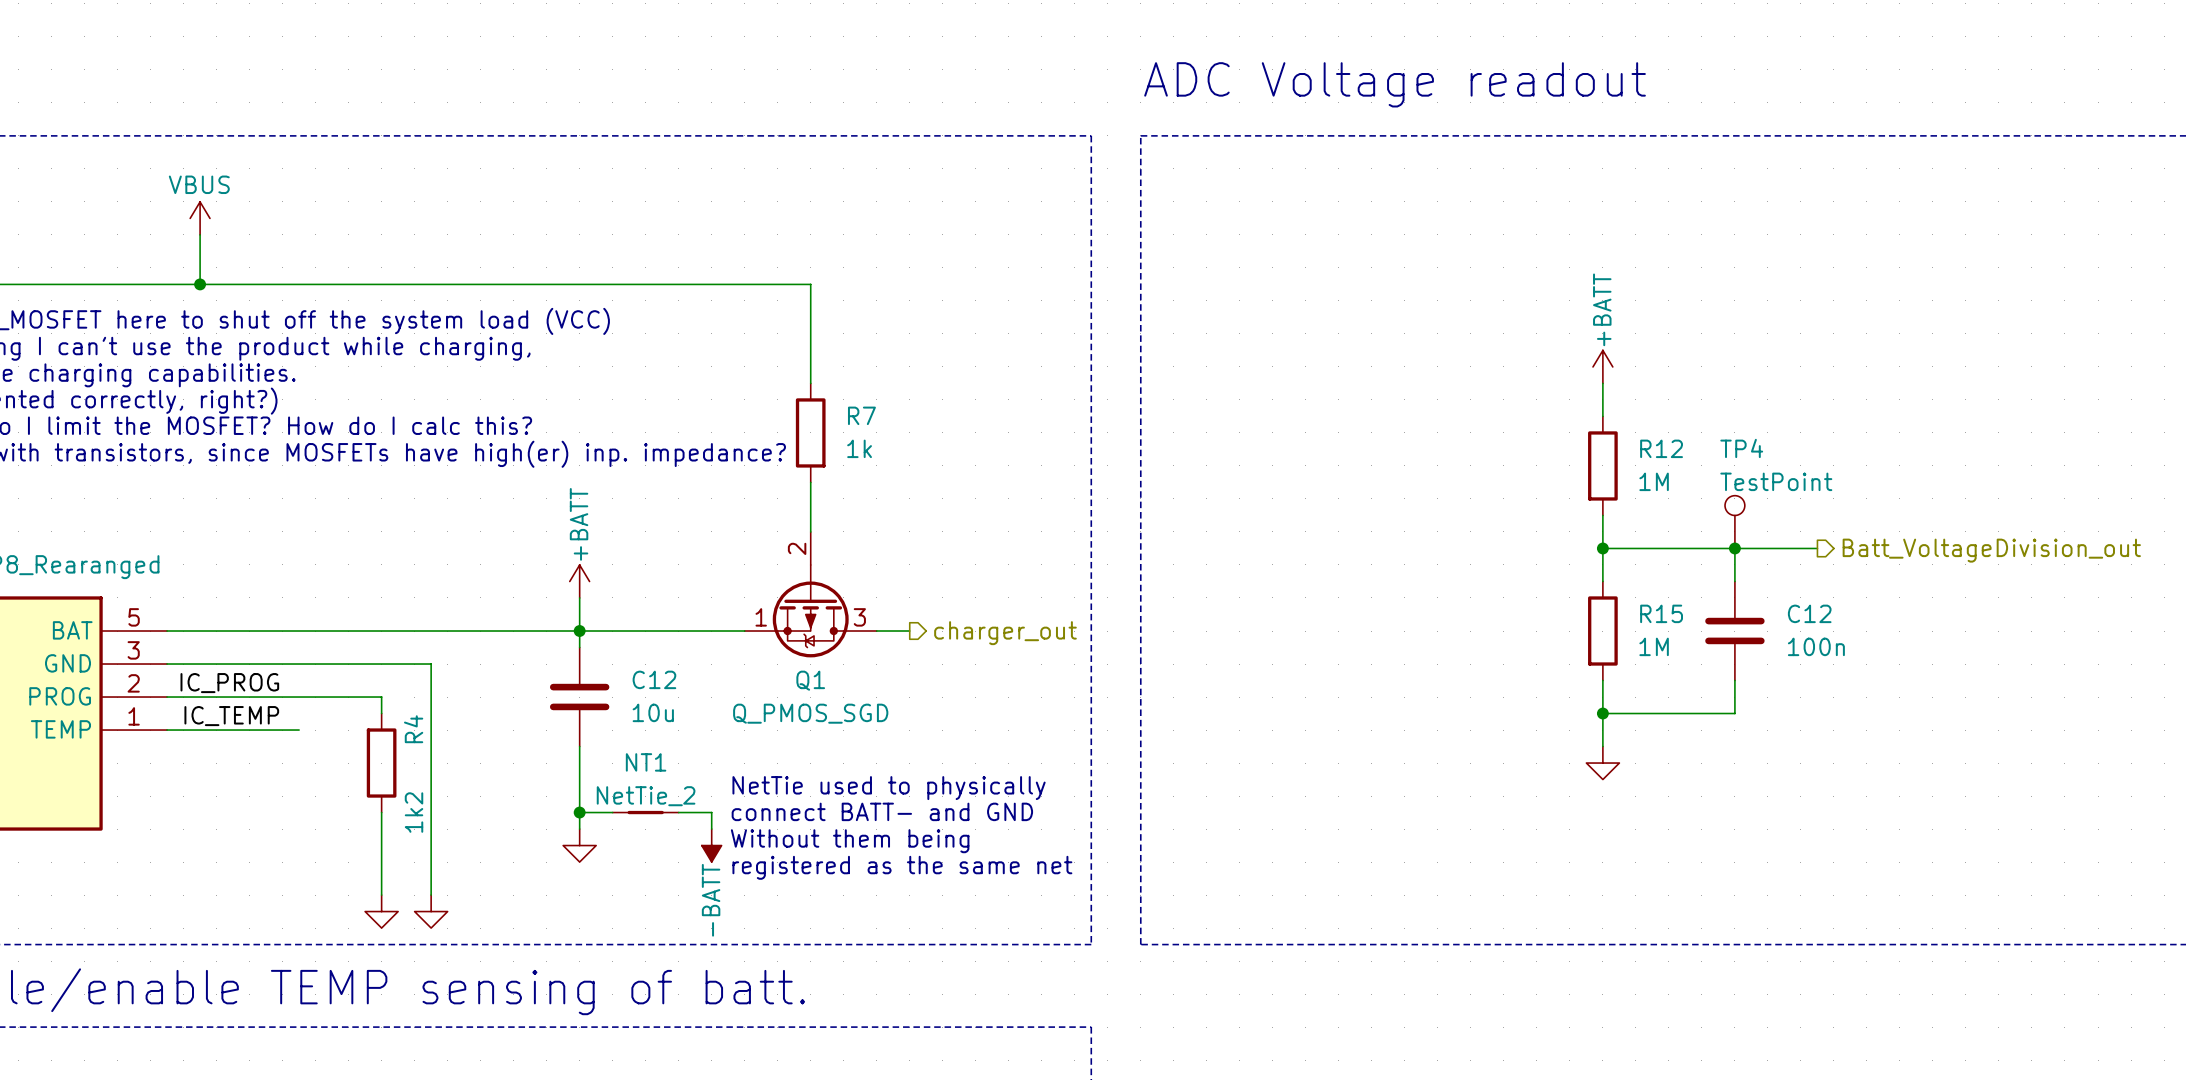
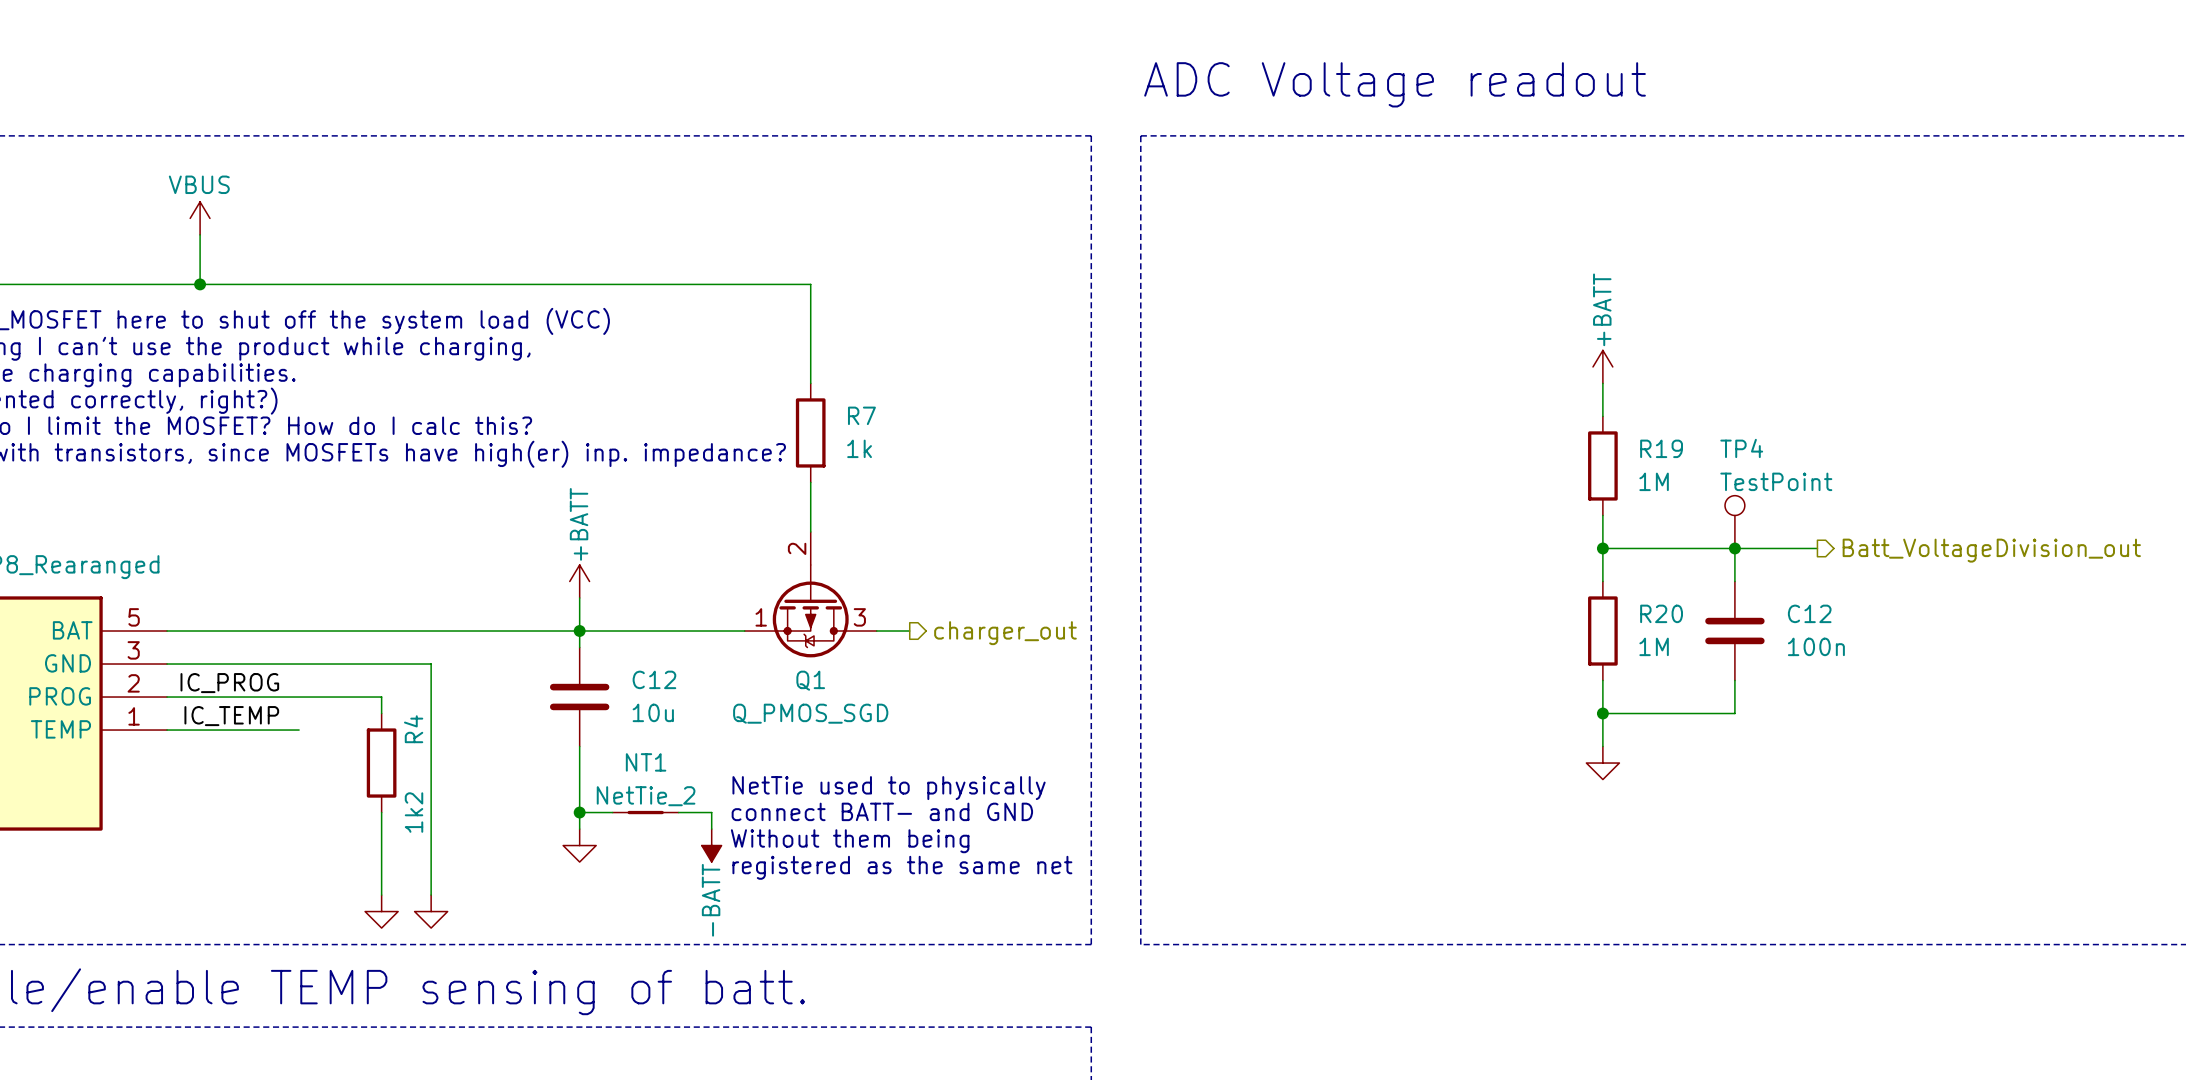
R12 name: R12 (1661, 448) -> R19 (1661, 448)
R15 name: R15 (1661, 613) -> R20 (1661, 613)

